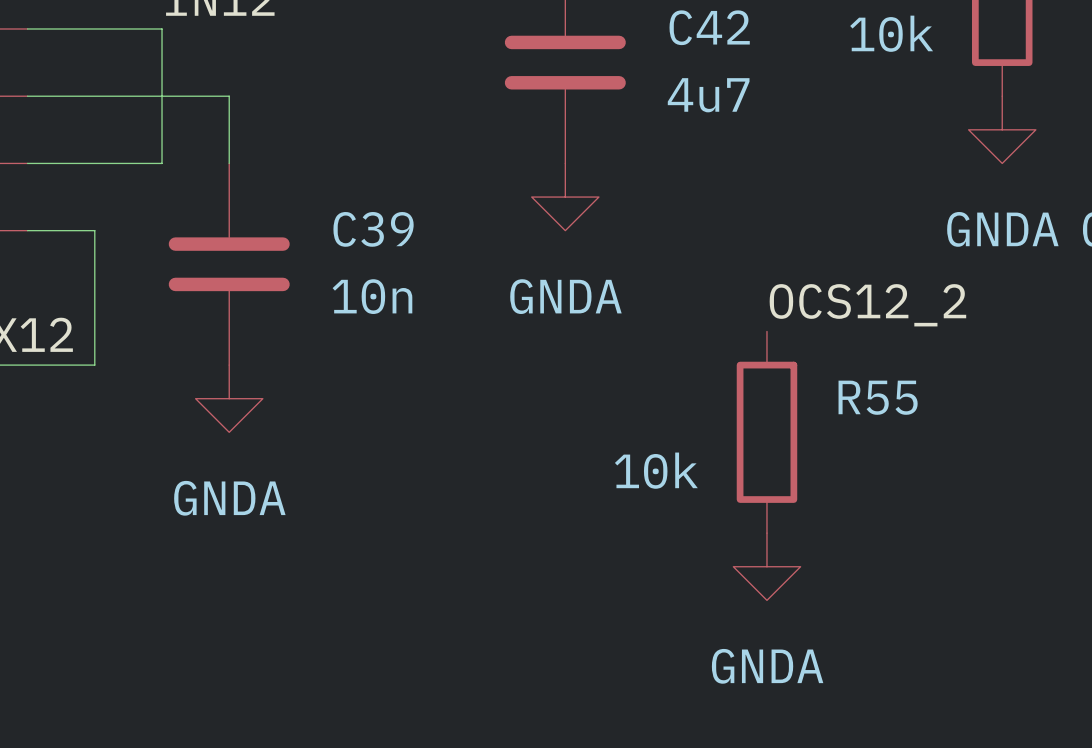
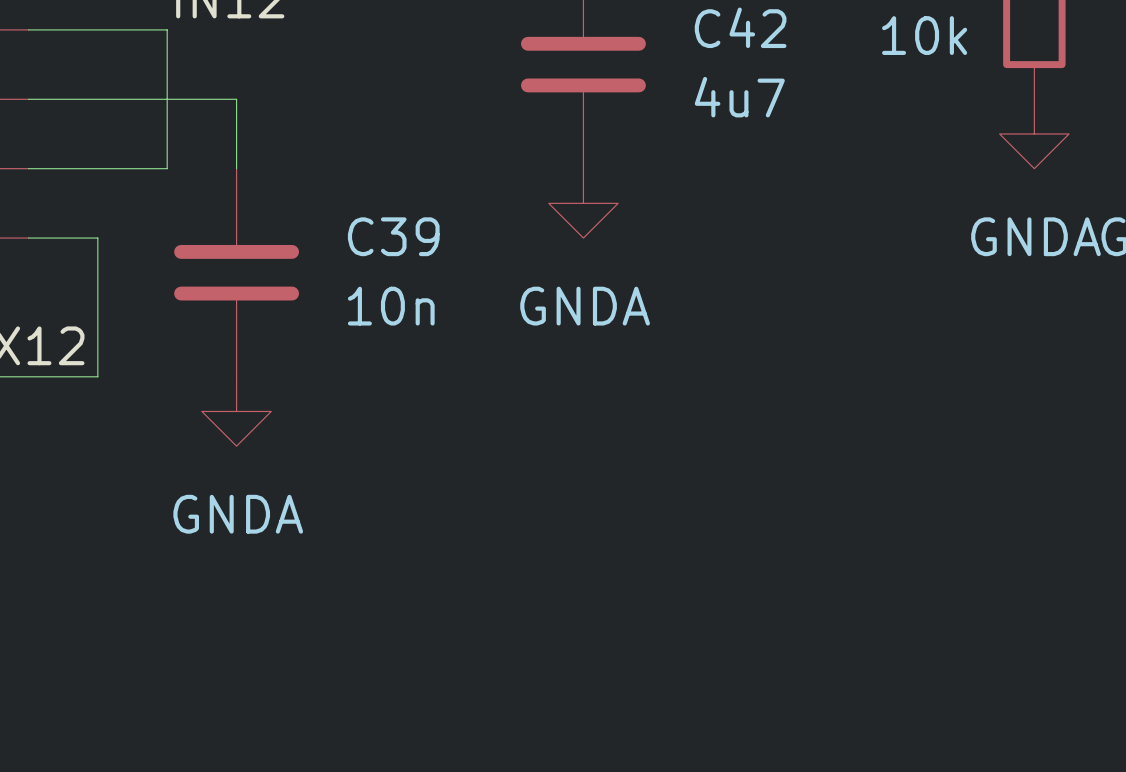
label: OCS12_2 (867, 305) -> none
R55: 10k (766, 432) -> none
power symbol: GNDA (766, 566) -> none

